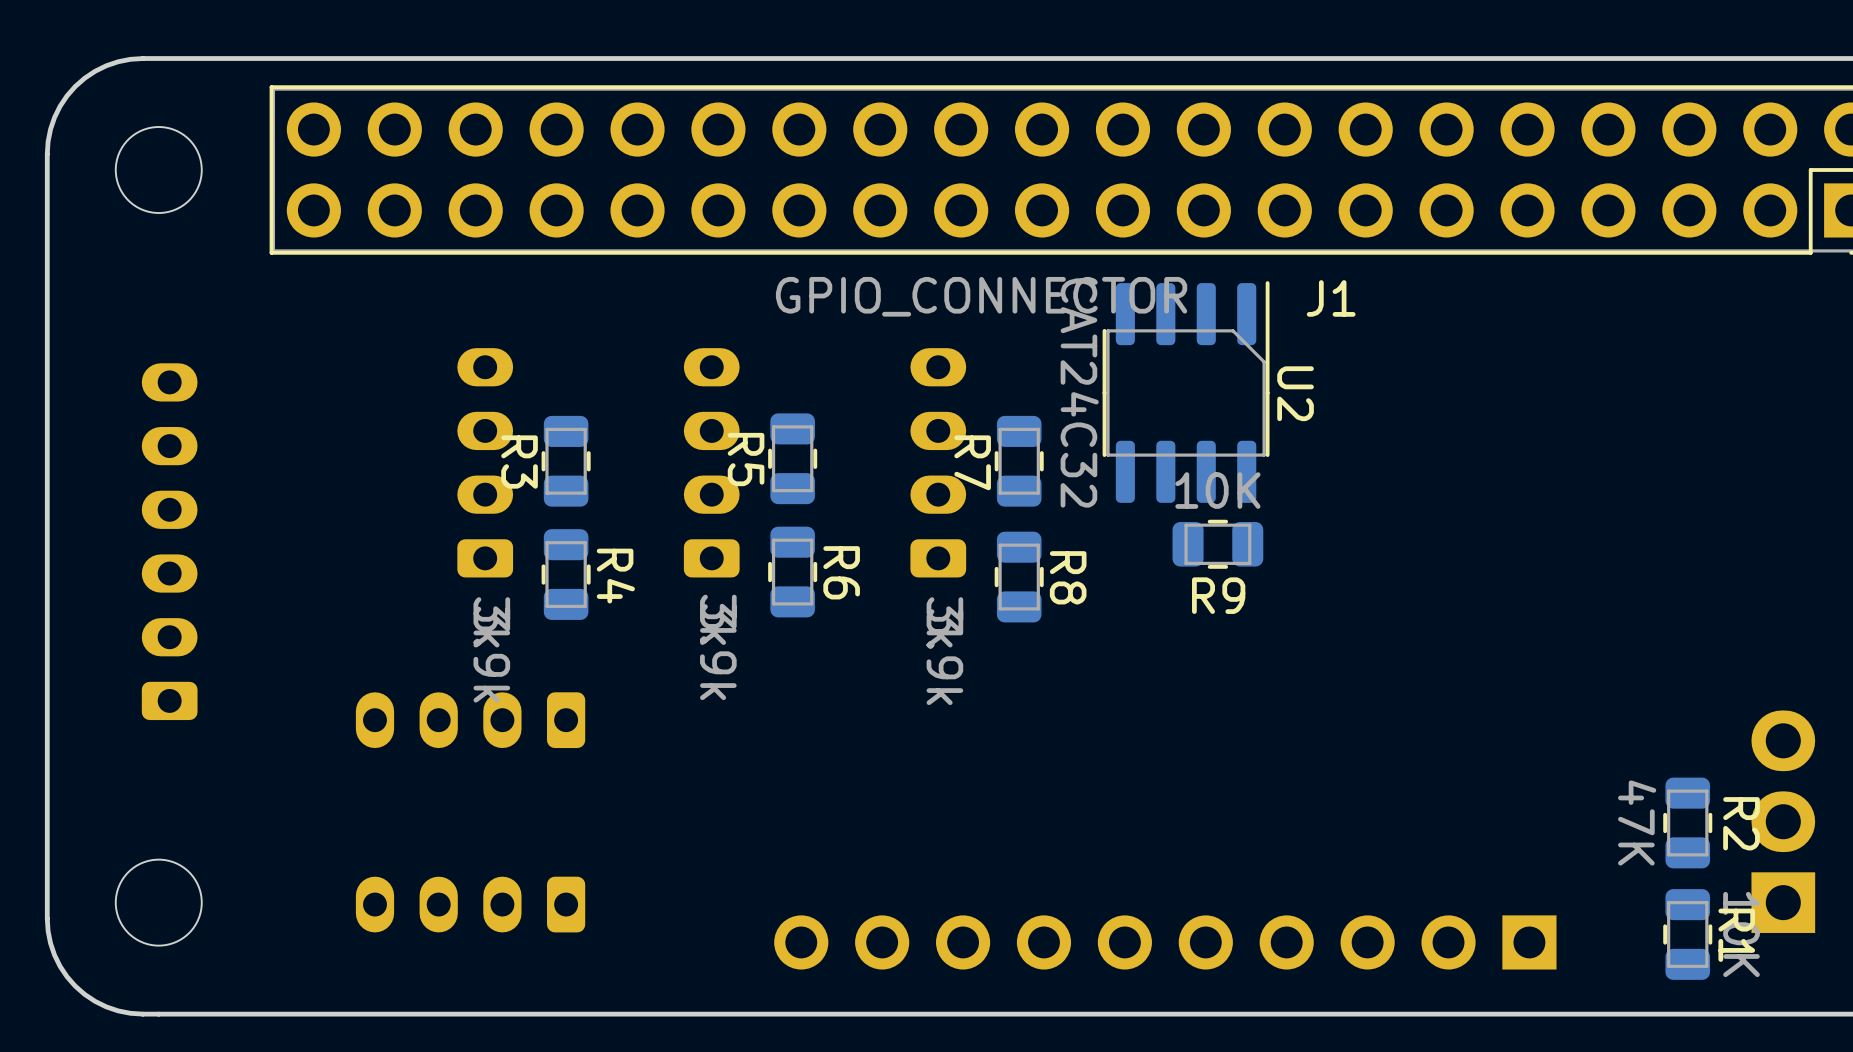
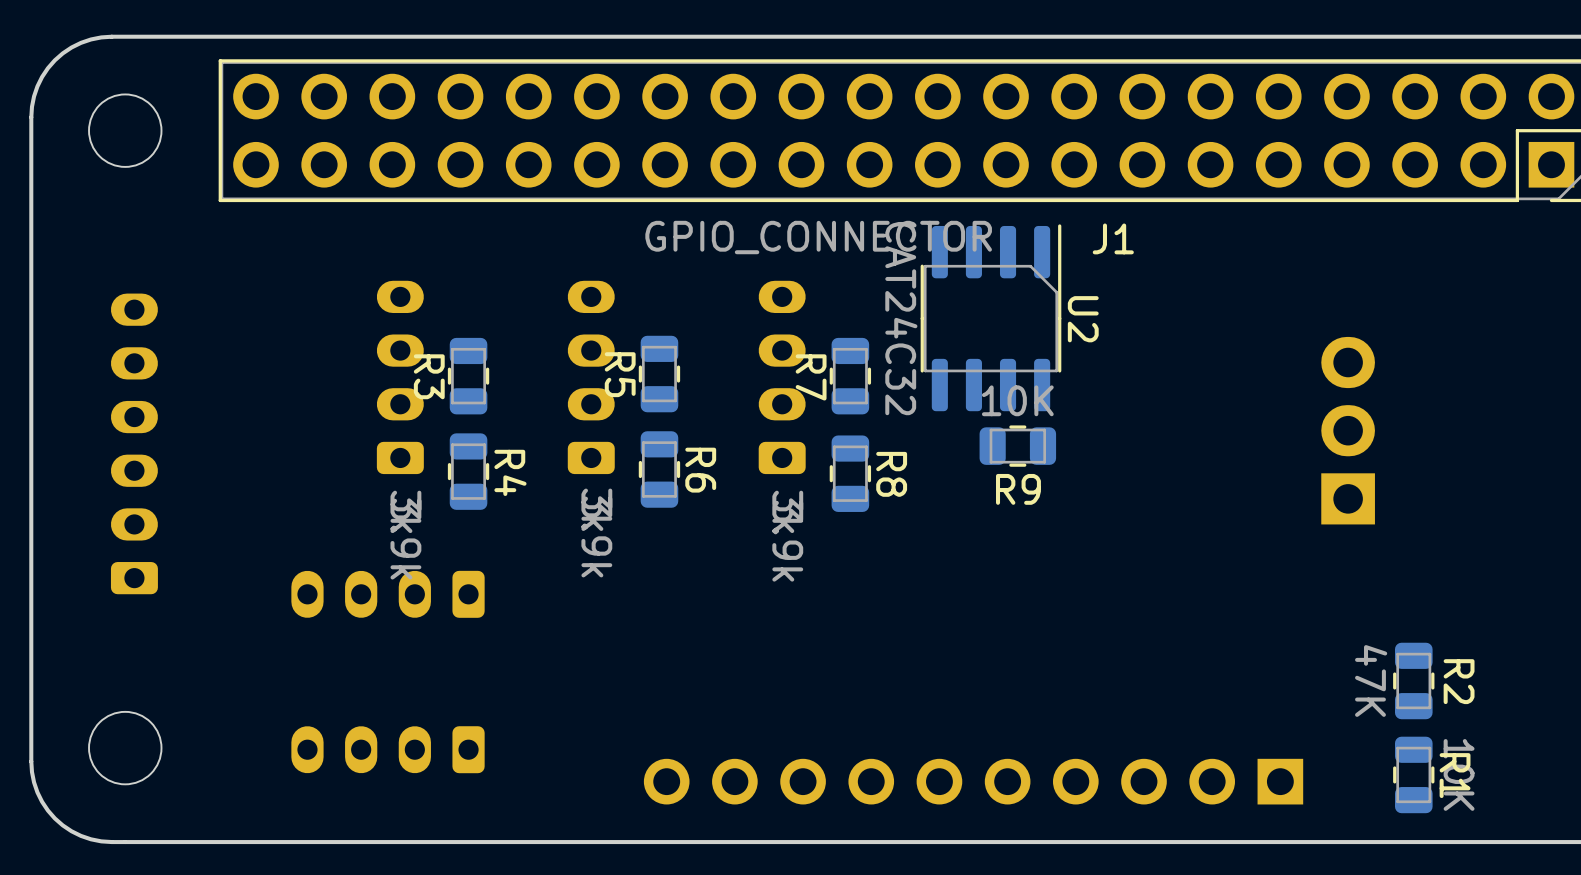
part position: (1783, 821) -> (1348, 430)

